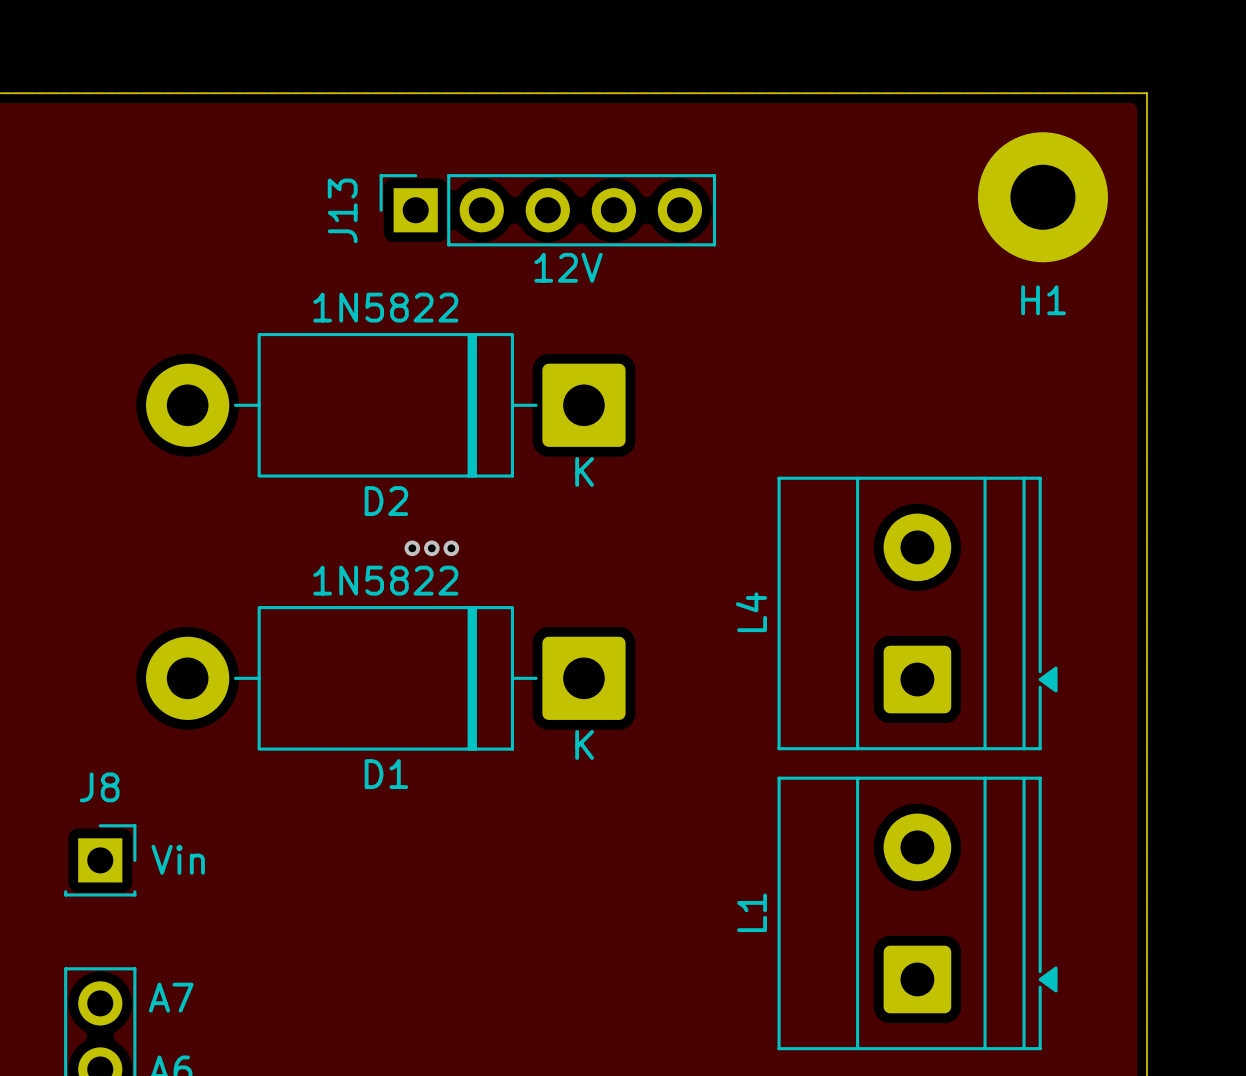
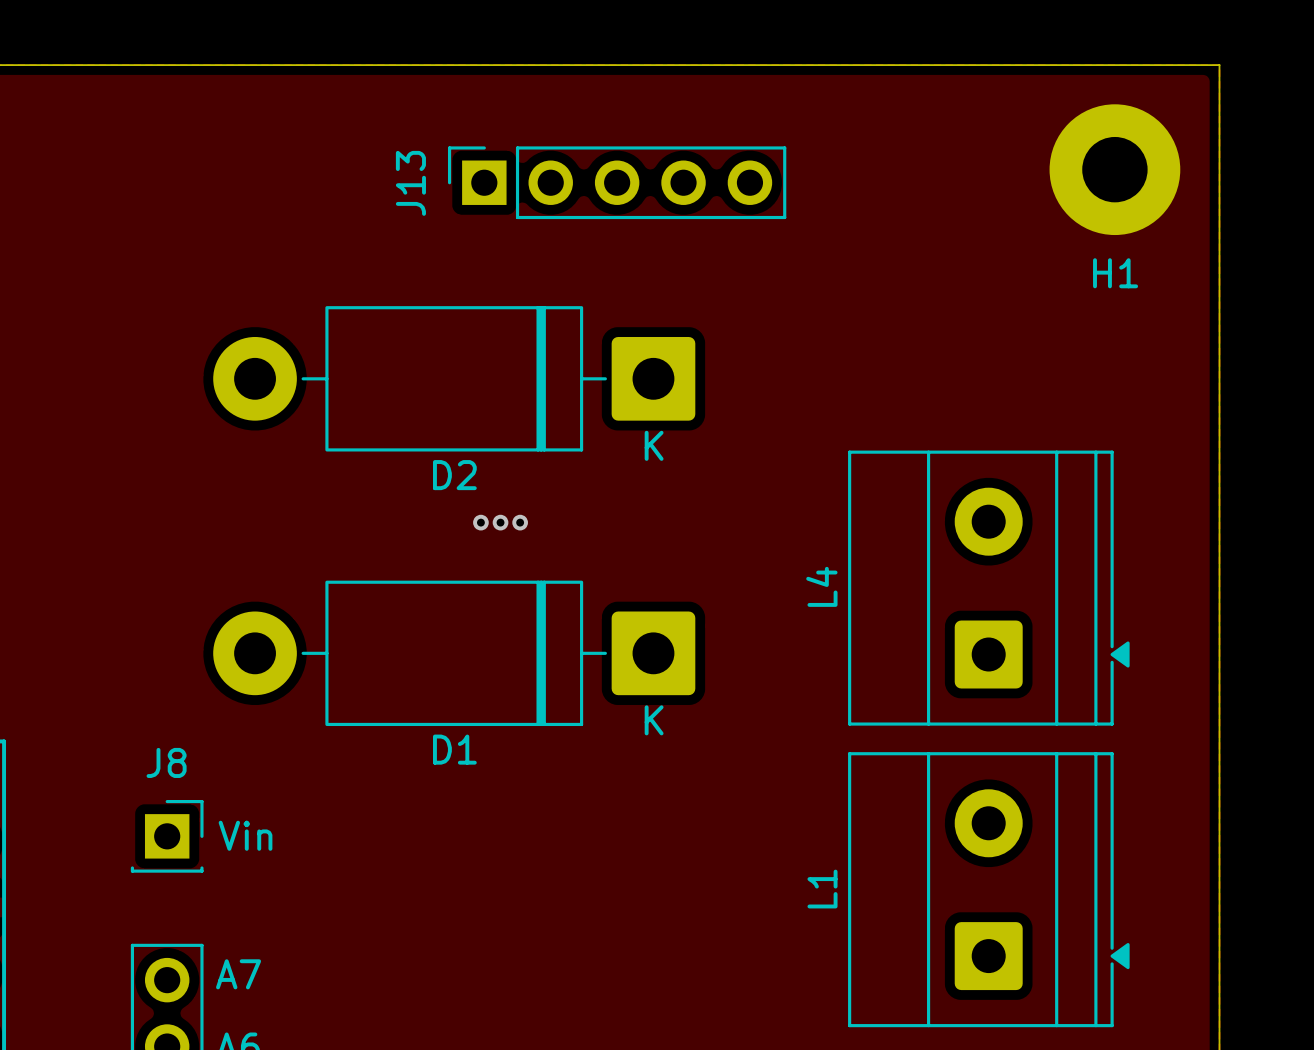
J13 value: 12V (568, 267) -> none
D2 value: 1N5822 (385, 307) -> none
D1 value: 1N5822 (385, 580) -> none

